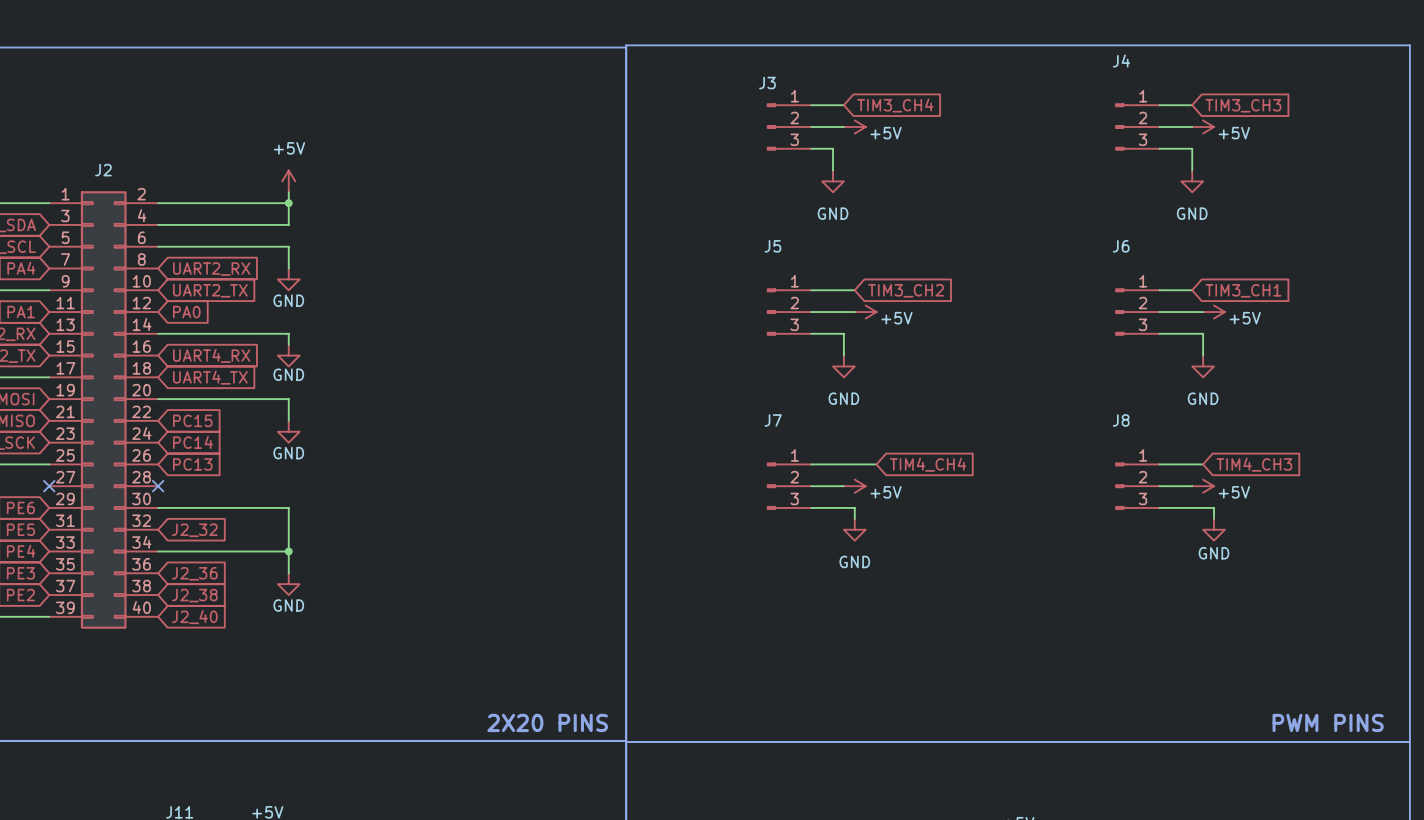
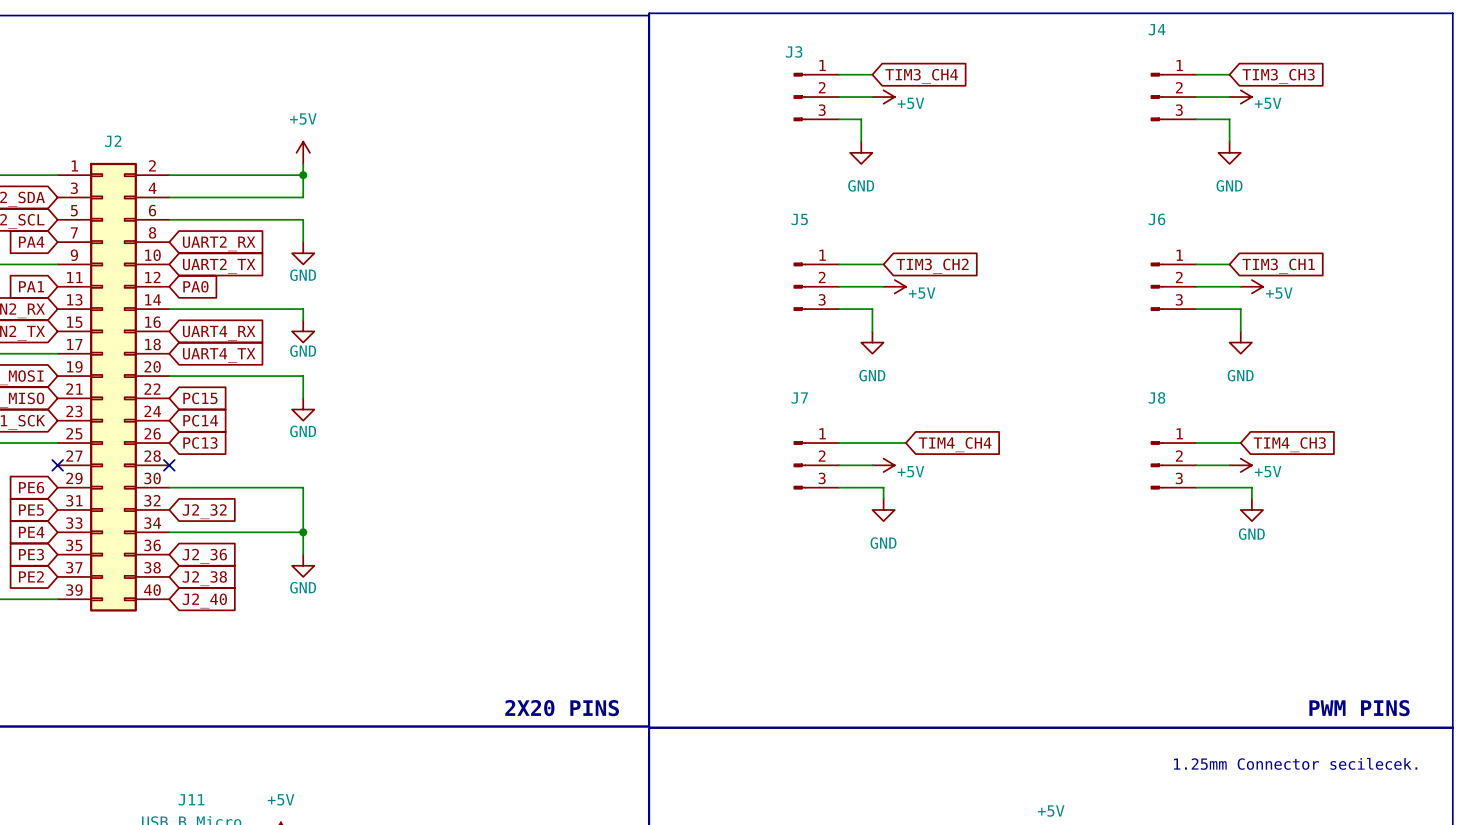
text: none -> 1.25mm Connector secilecek. (1295, 763)

